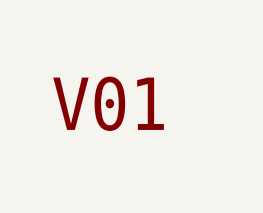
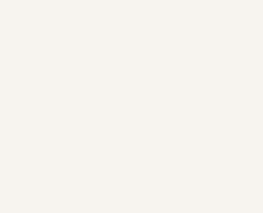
text: V01 (108, 103) -> none

